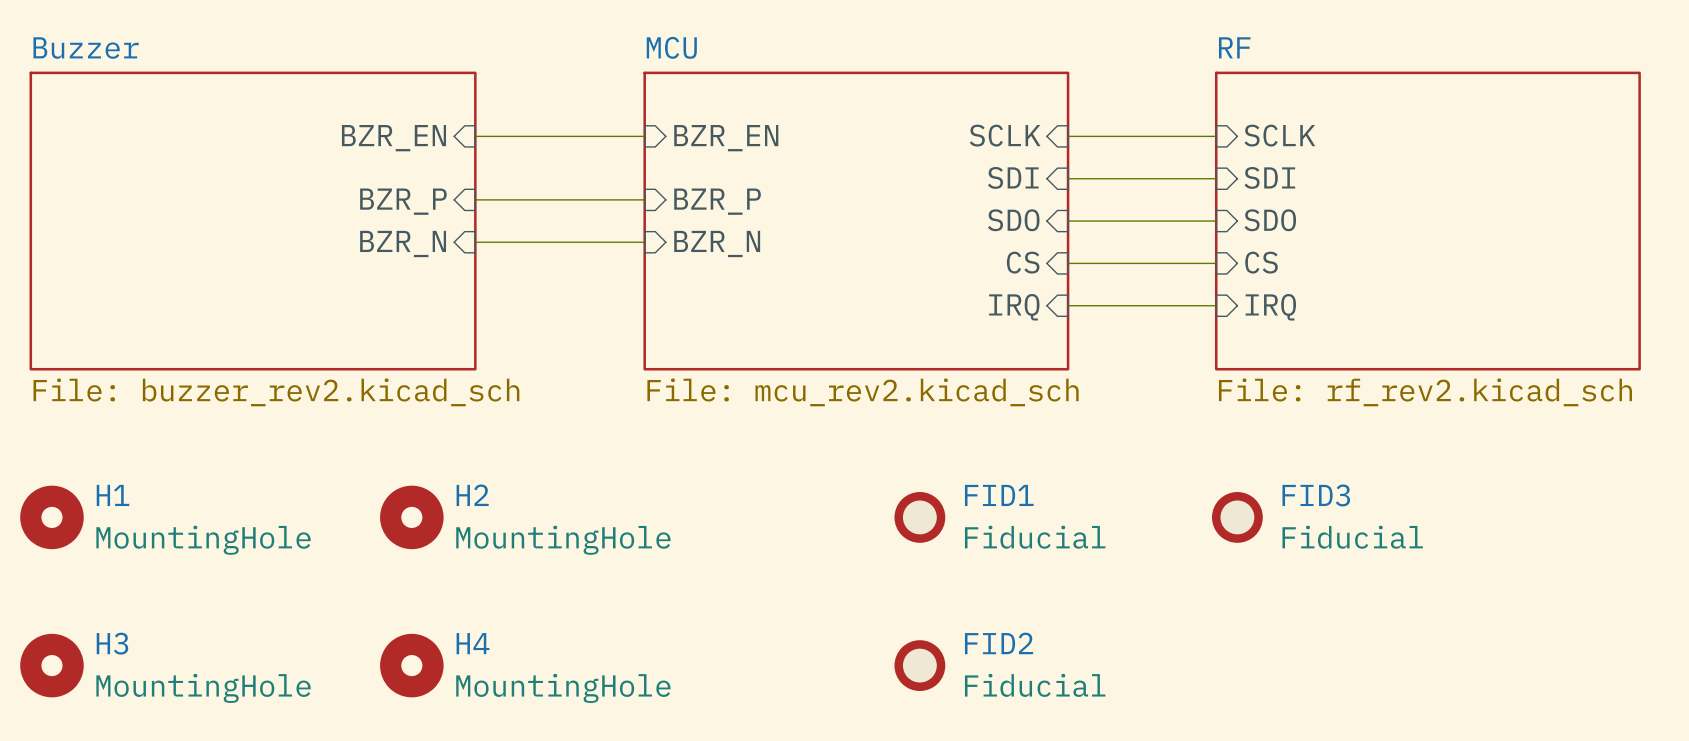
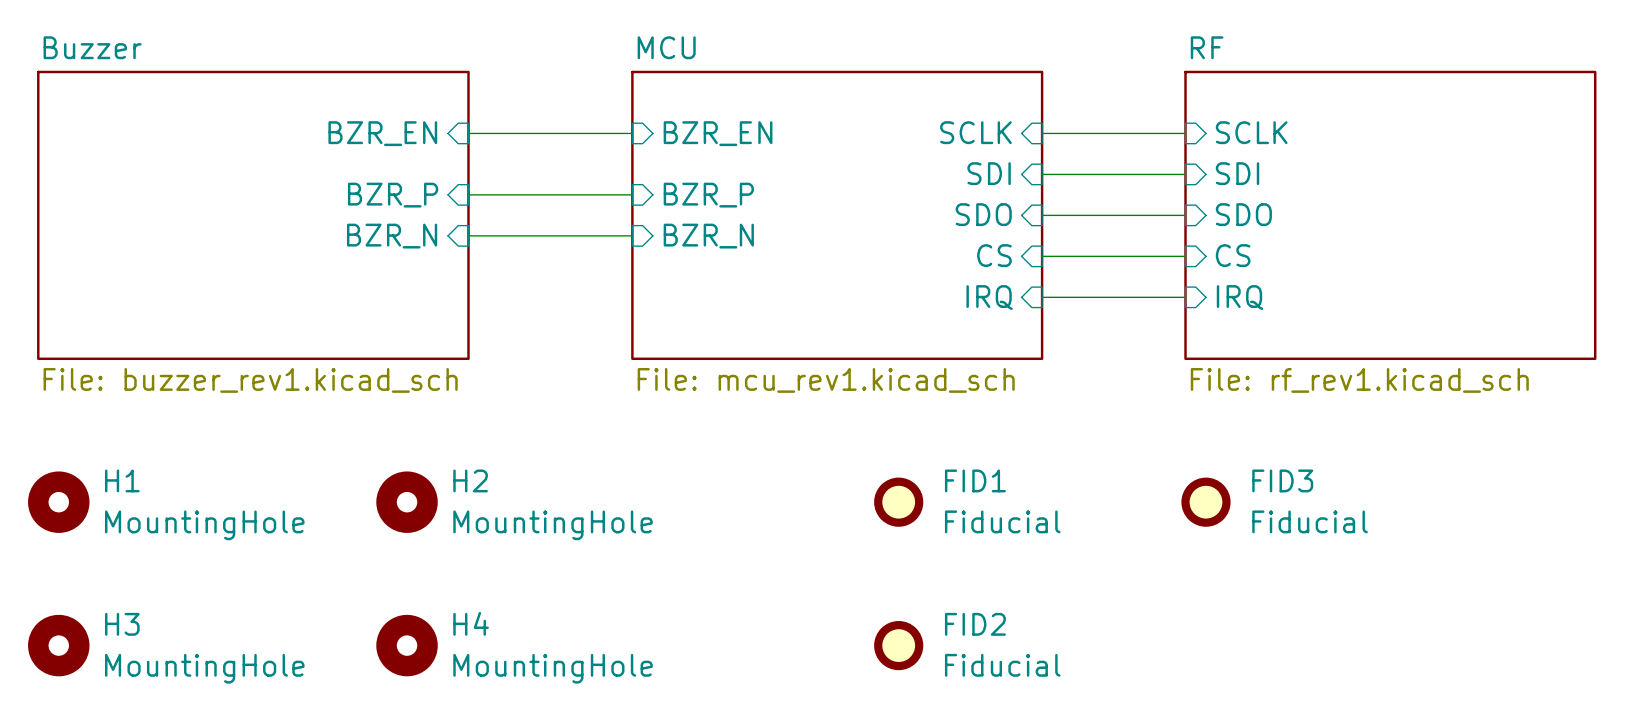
sheet Buzzer value: File: buzzer_rev2.kicad_sch (276, 392) -> File: buzzer_rev1.kicad_sch (250, 380)
sheet MCU value: File: mcu_rev2.kicad_sch (863, 392) -> File: mcu_rev1.kicad_sch (826, 380)
sheet RF value: File: rf_rev2.kicad_sch (1425, 392) -> File: rf_rev1.kicad_sch (1359, 380)

